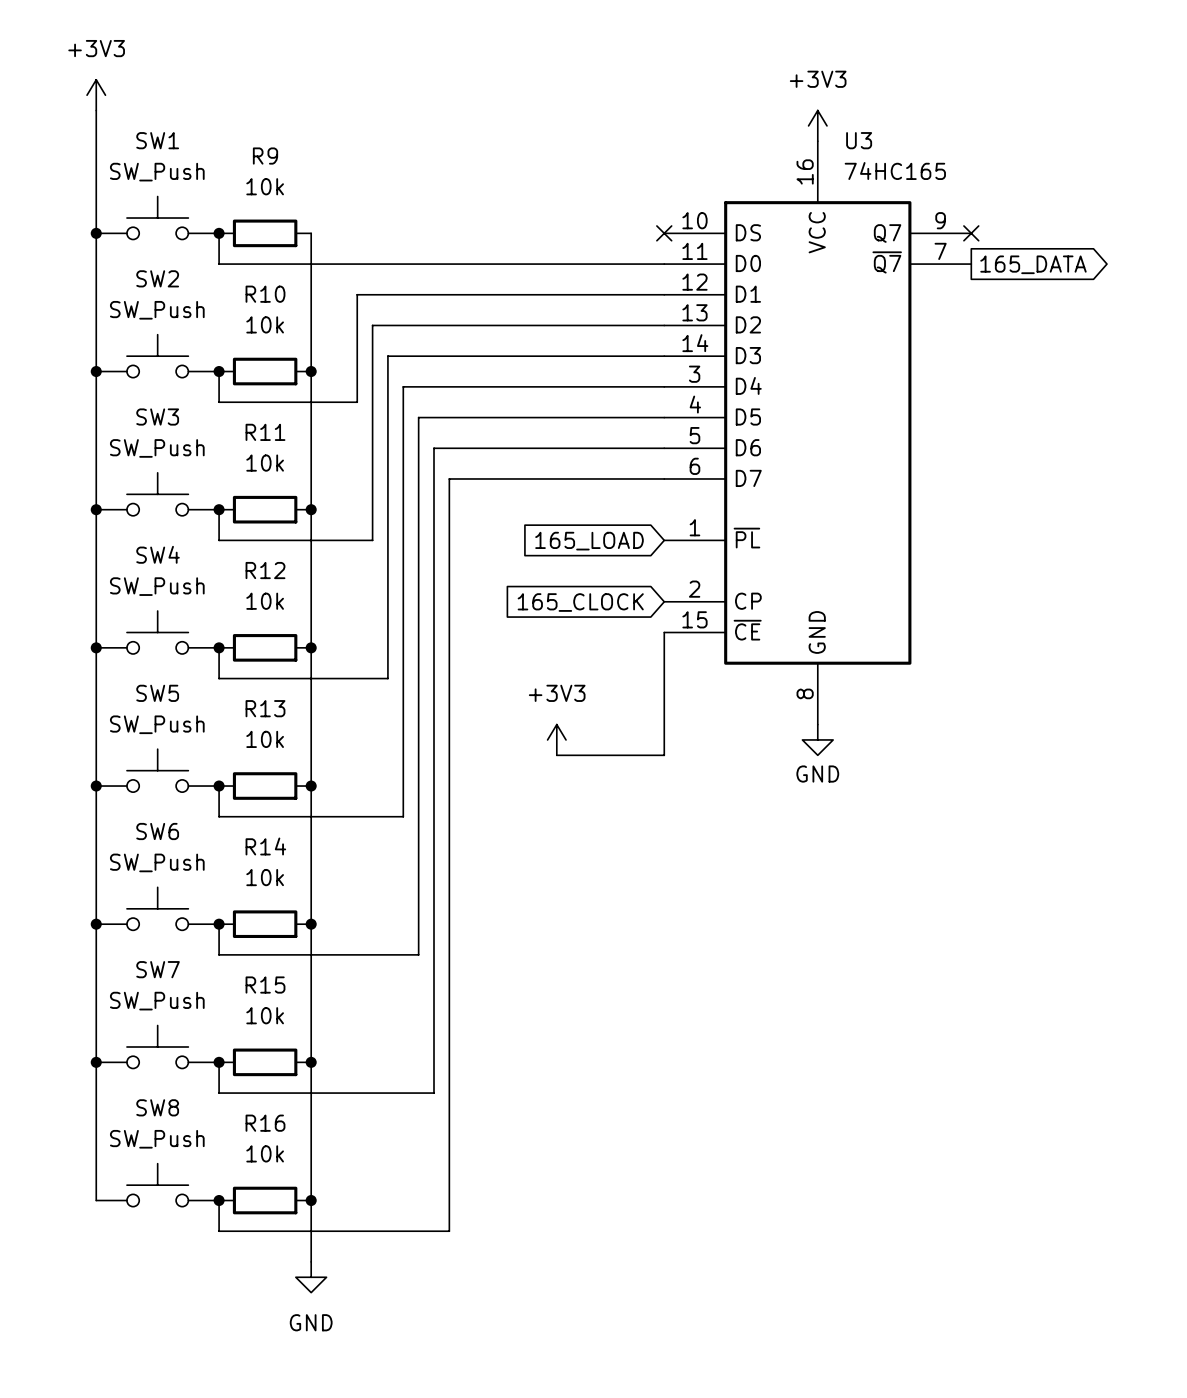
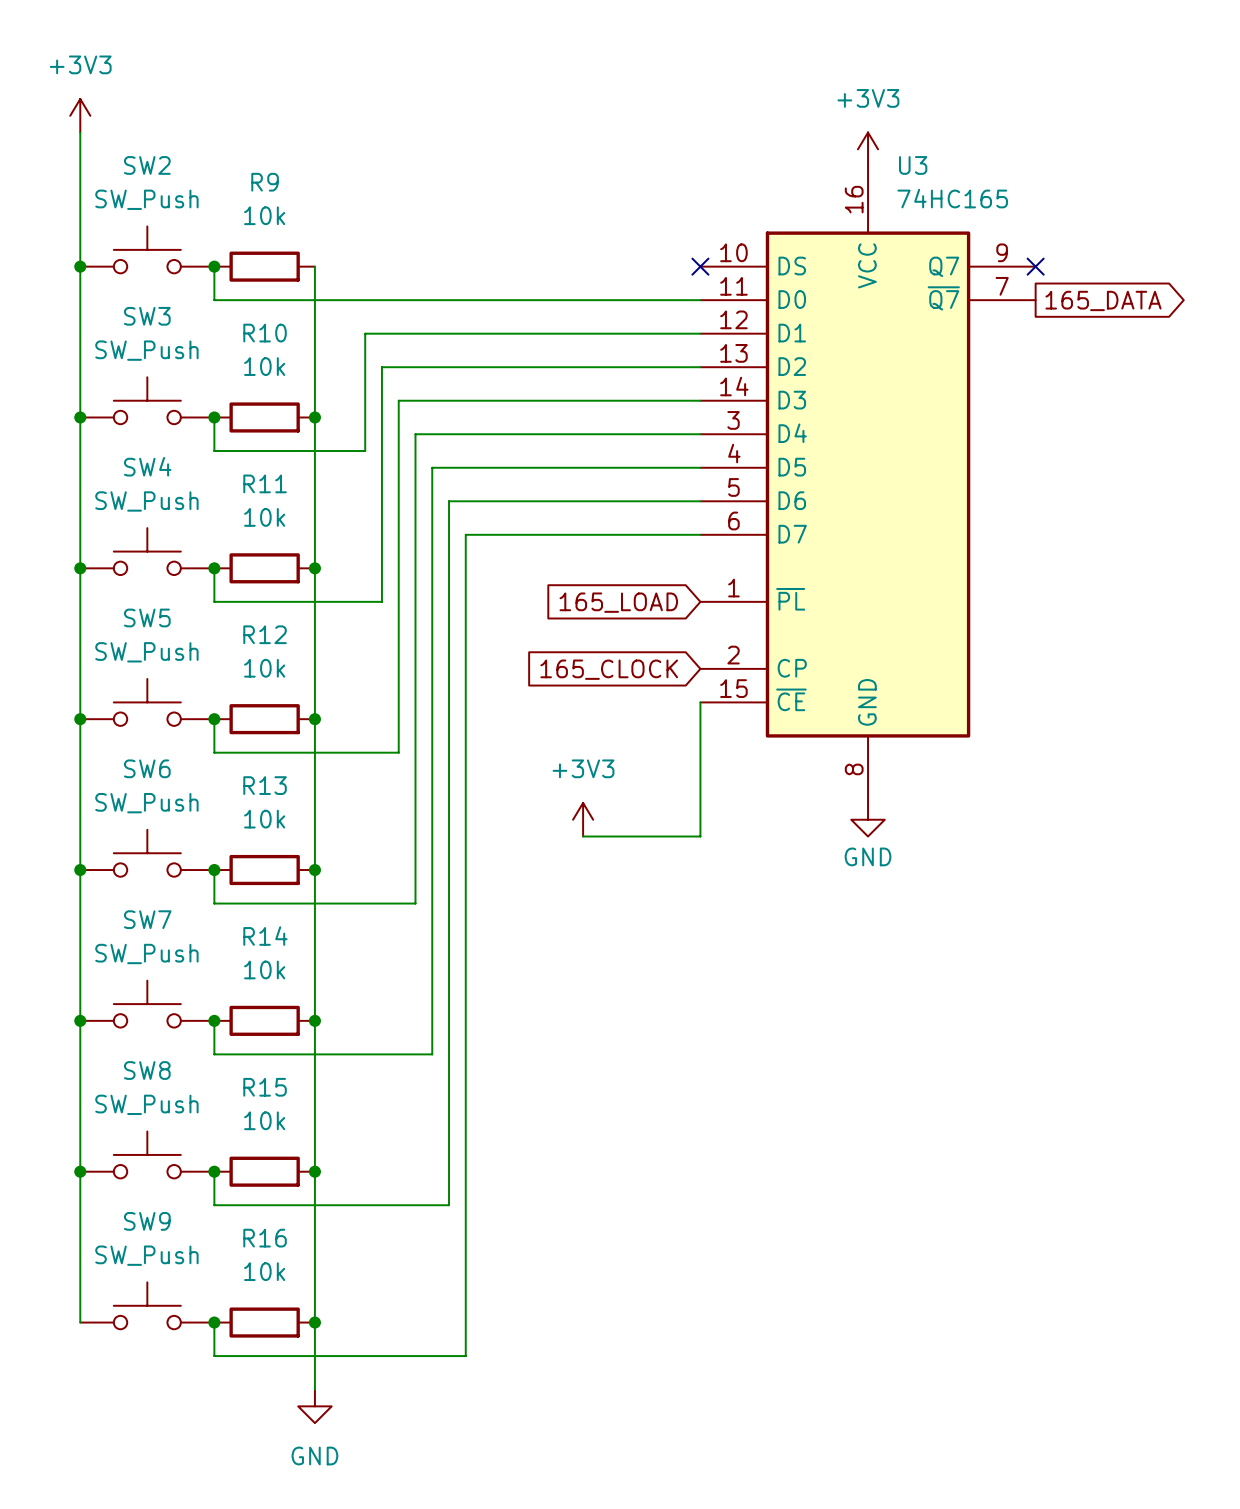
SW1 name: SW1 (157, 140) -> SW2 (147, 165)
SW2 name: SW2 (157, 278) -> SW3 (147, 316)
SW3 name: SW3 (157, 417) -> SW4 (147, 466)
SW4 name: SW4 (158, 554) -> SW5 (147, 617)
SW5 name: SW5 (157, 693) -> SW6 (147, 768)
SW6 name: SW6 (157, 831) -> SW7 (147, 919)
SW7 name: SW7 (158, 969) -> SW8 (147, 1070)
SW8 name: SW8 (157, 1107) -> SW9 (147, 1221)

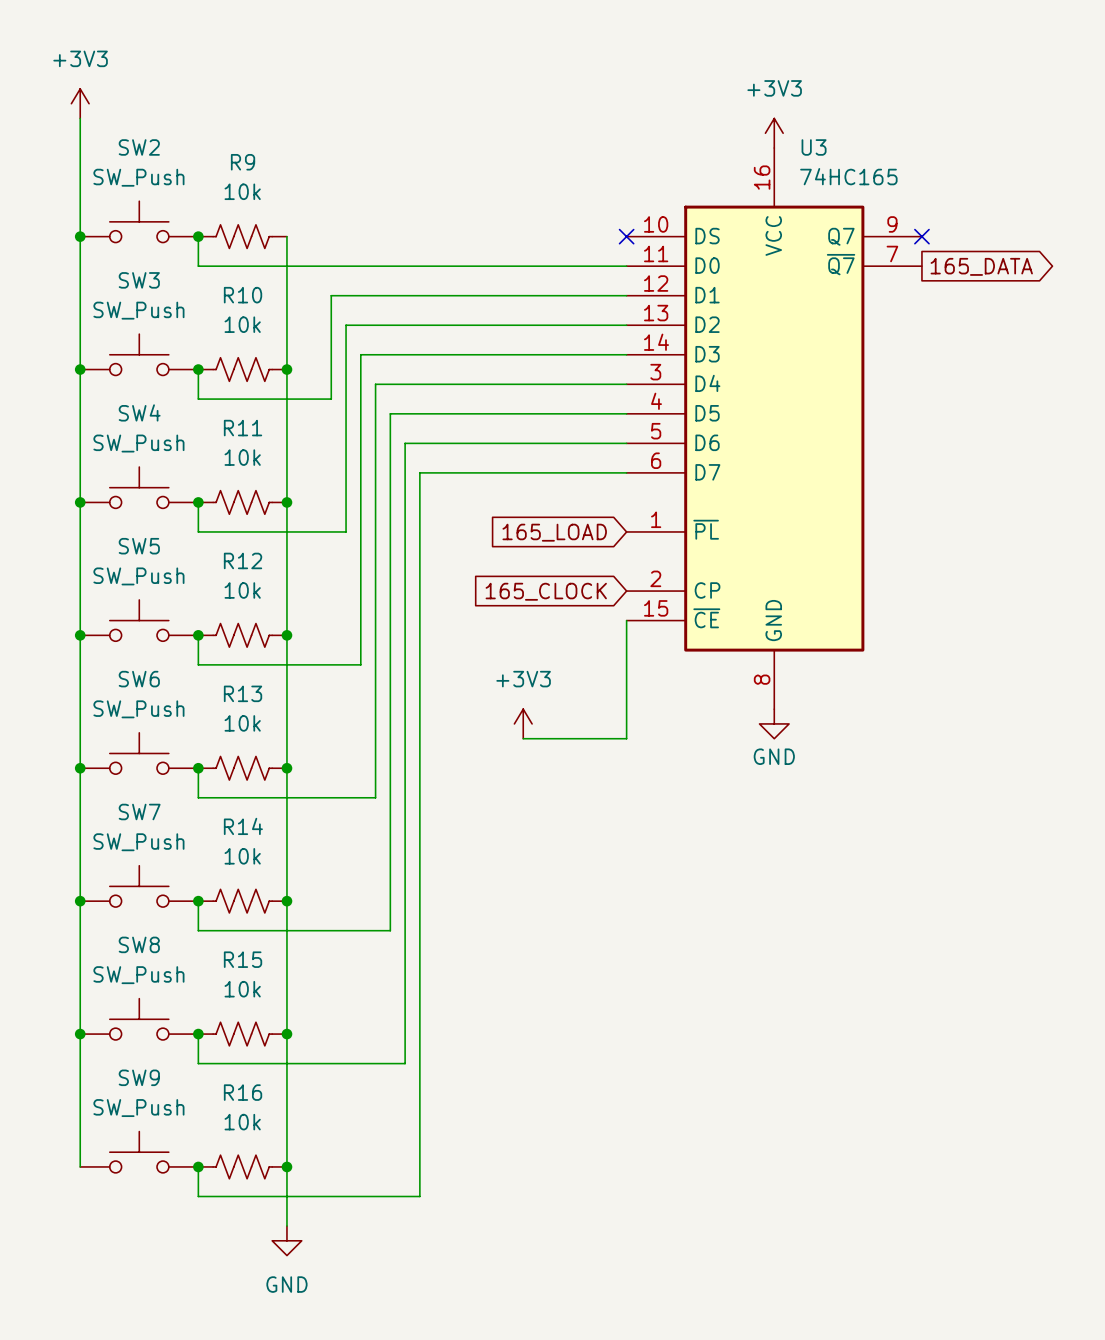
R9 symbol: [214, 251, 315, 282] -> [198, 224, 287, 249]
R10 symbol: [214, 402, 315, 433] -> [198, 357, 287, 382]
R11 symbol: [214, 553, 315, 584] -> [198, 490, 287, 515]
R12 symbol: [214, 704, 315, 735] -> [198, 623, 287, 648]
R13 symbol: [214, 854, 315, 886] -> [198, 756, 287, 781]
R14 symbol: [214, 1005, 315, 1036] -> [198, 889, 287, 913]
R15 symbol: [214, 1156, 315, 1187] -> [198, 1022, 287, 1046]
R16 symbol: [214, 1307, 315, 1338] -> [198, 1155, 287, 1179]

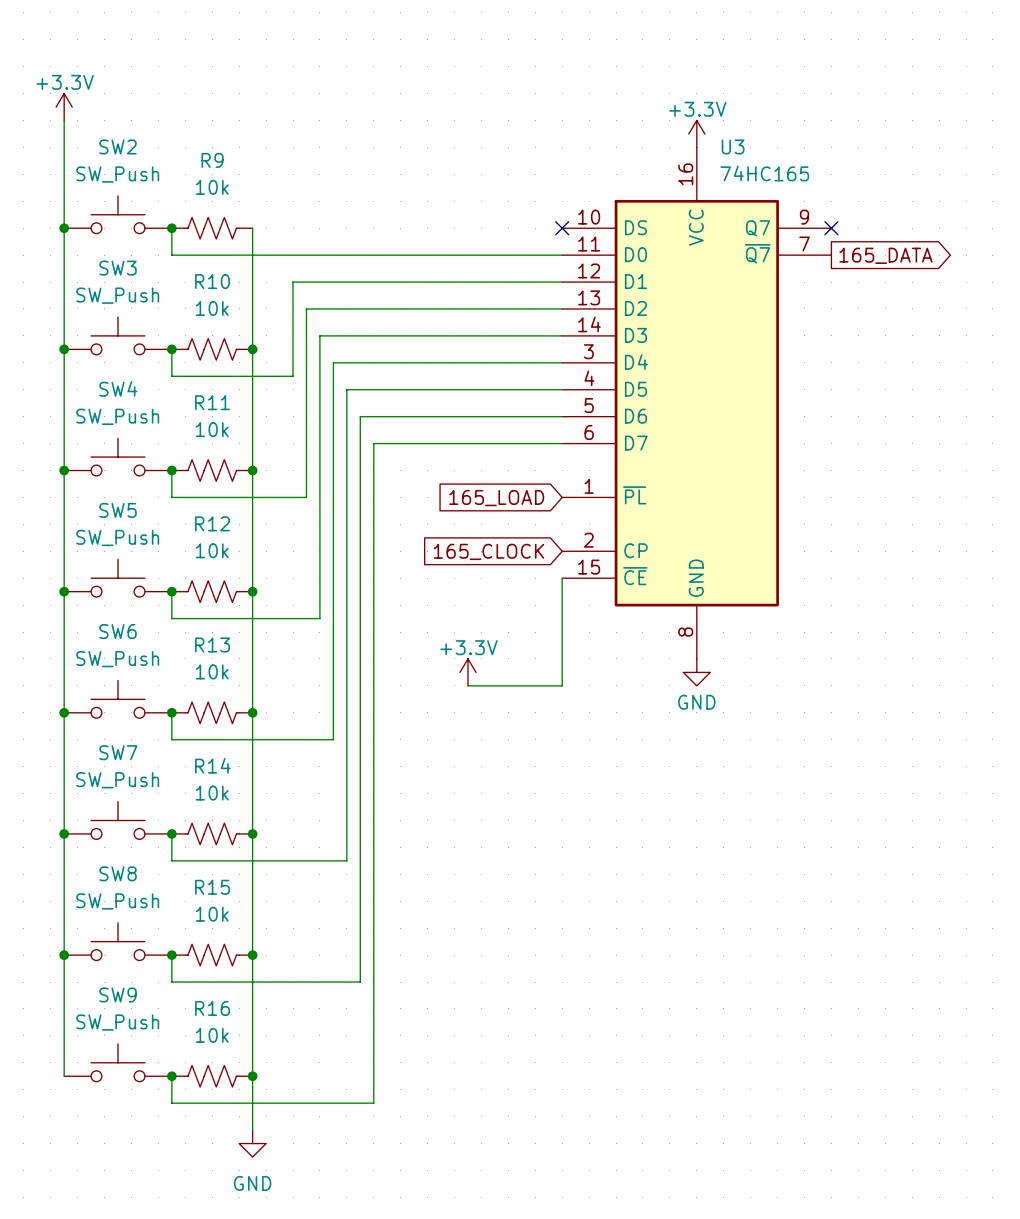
power symbol: +3V3 (80, 103) -> +3.3V (64, 107)
power symbol: +3V3 (774, 133) -> +3.3V (696, 134)
power symbol: +3V3 (523, 723) -> +3.3V (467, 672)

